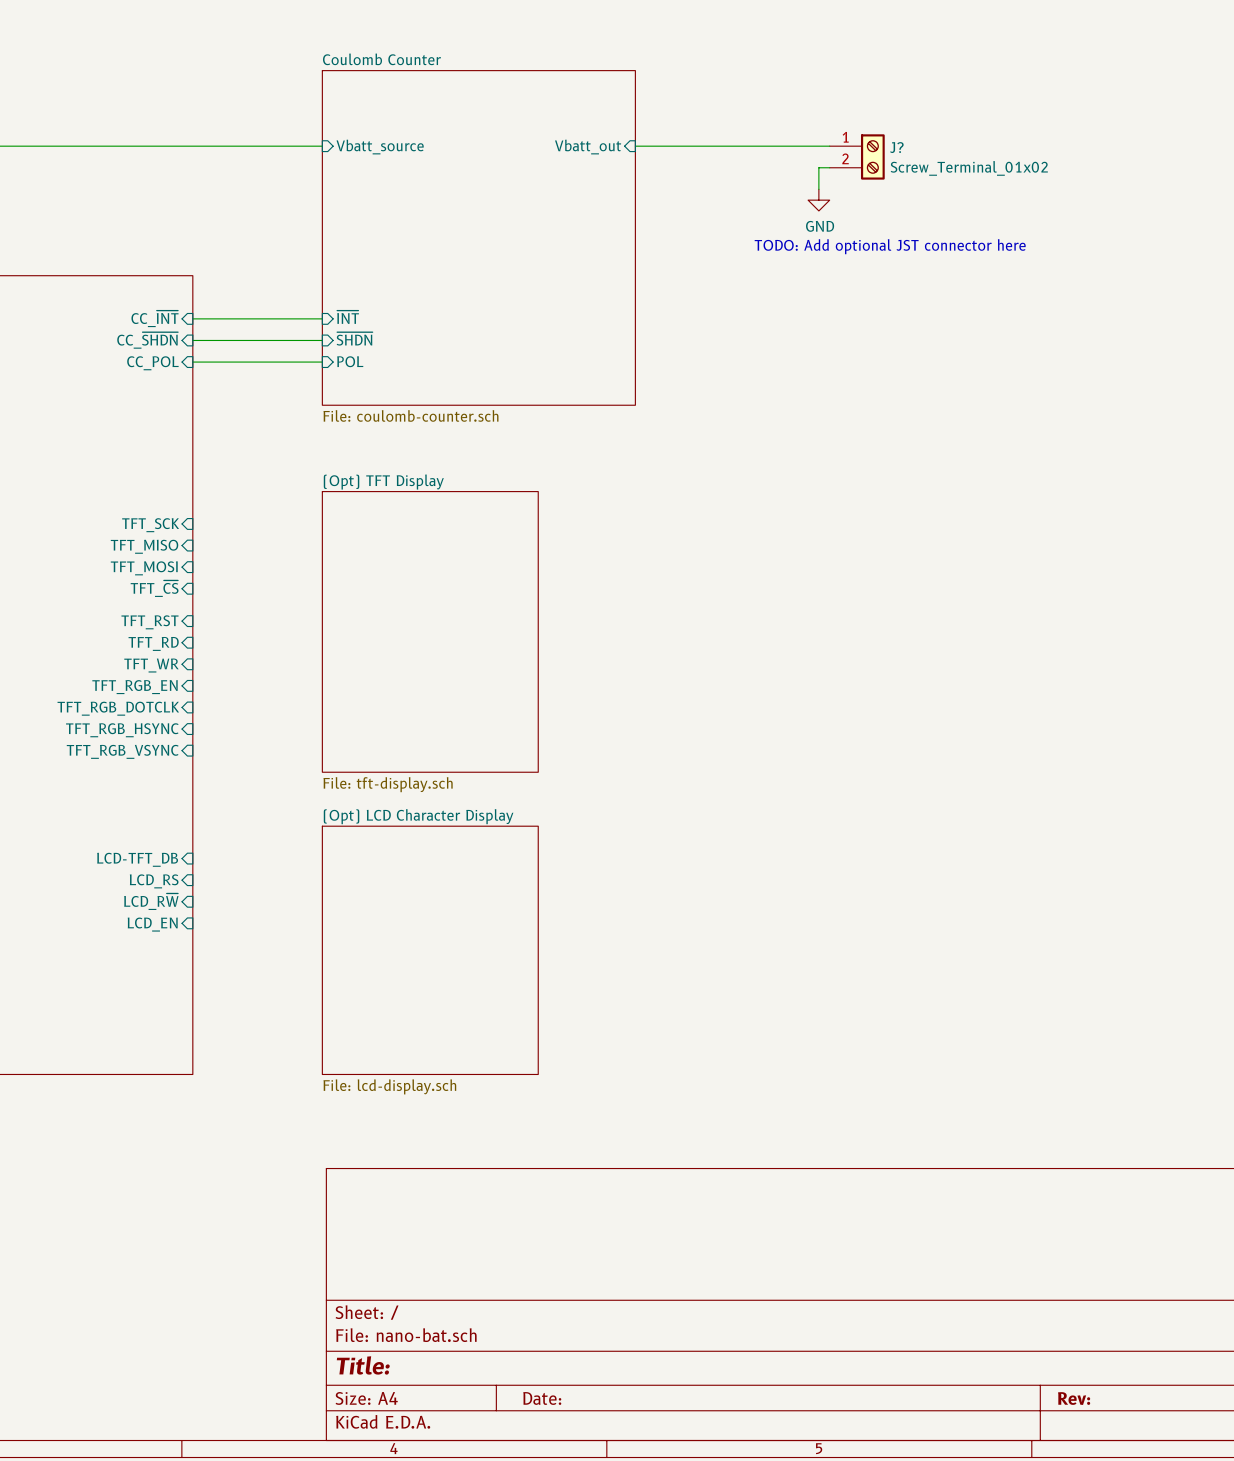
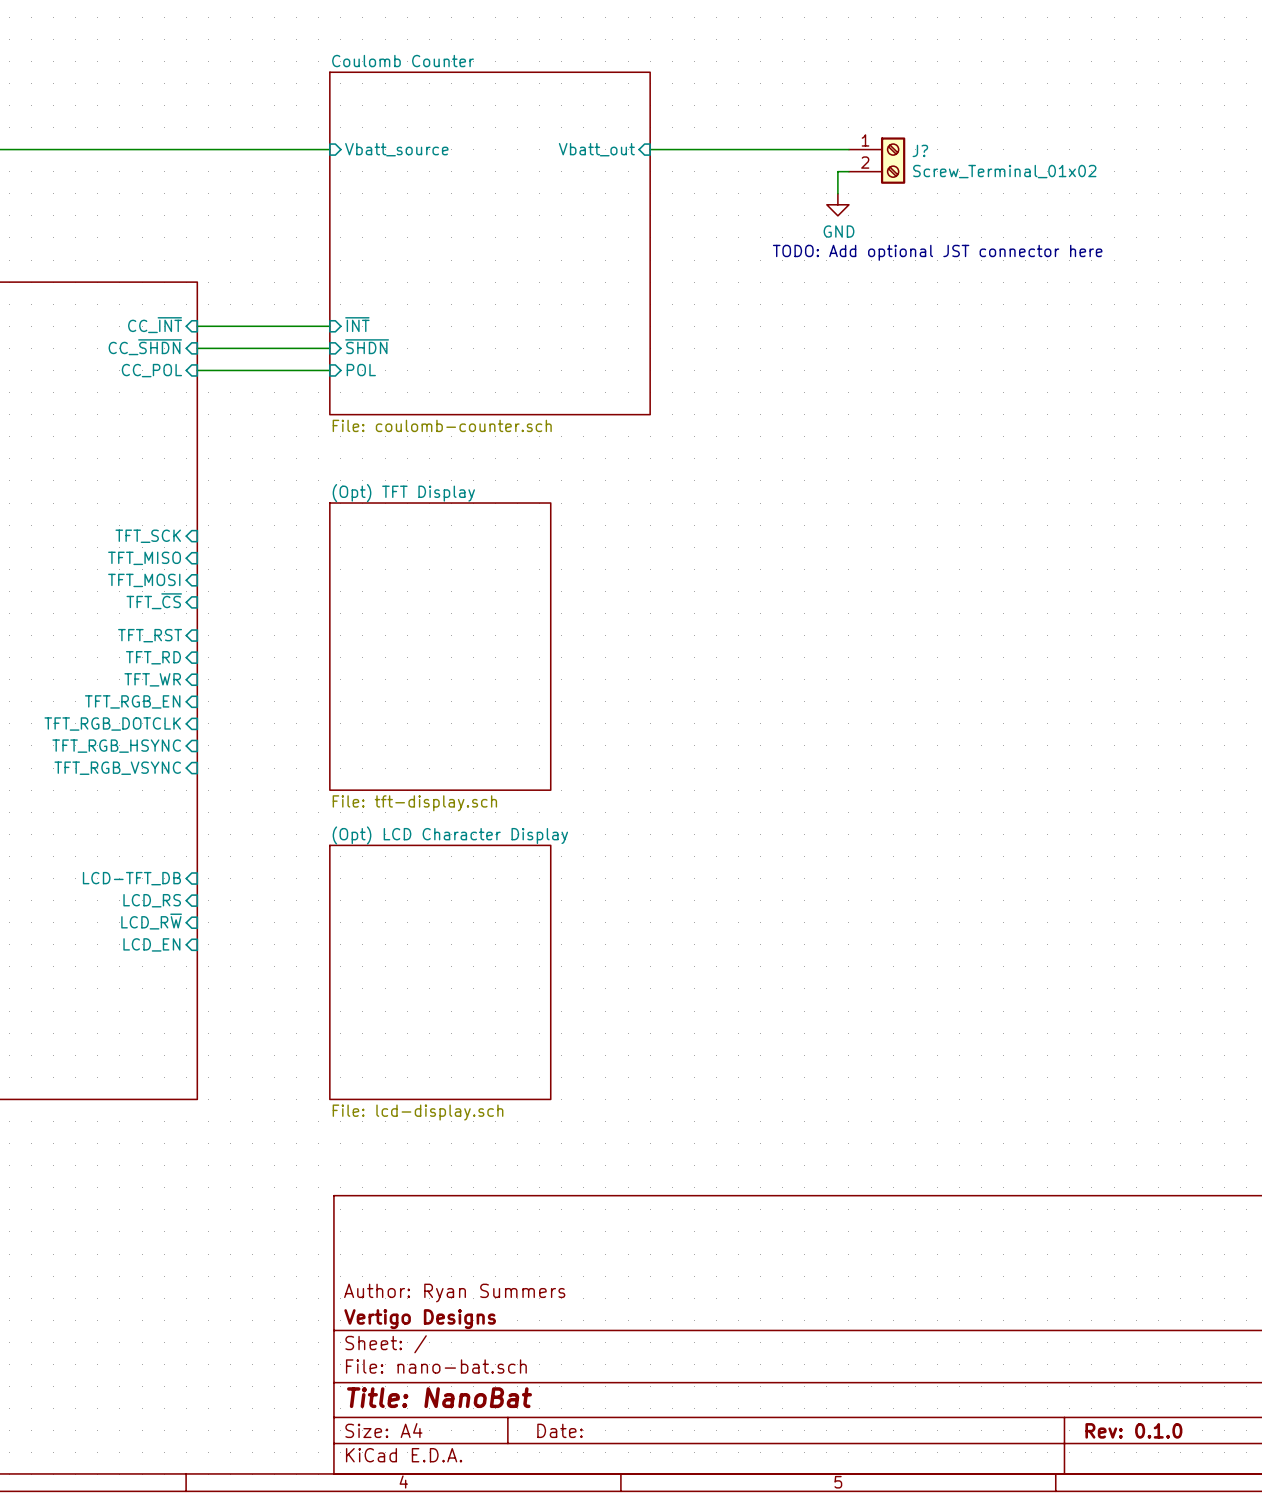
title block: none -> Author: Ryan Summers (454, 1293)
title block: none -> Vertigo Designs (420, 1319)
title block: Title: (363, 1365) -> Title: NanoBat (439, 1397)
title block: Rev: (1074, 1398) -> Rev: 0.1.0 (1133, 1430)

